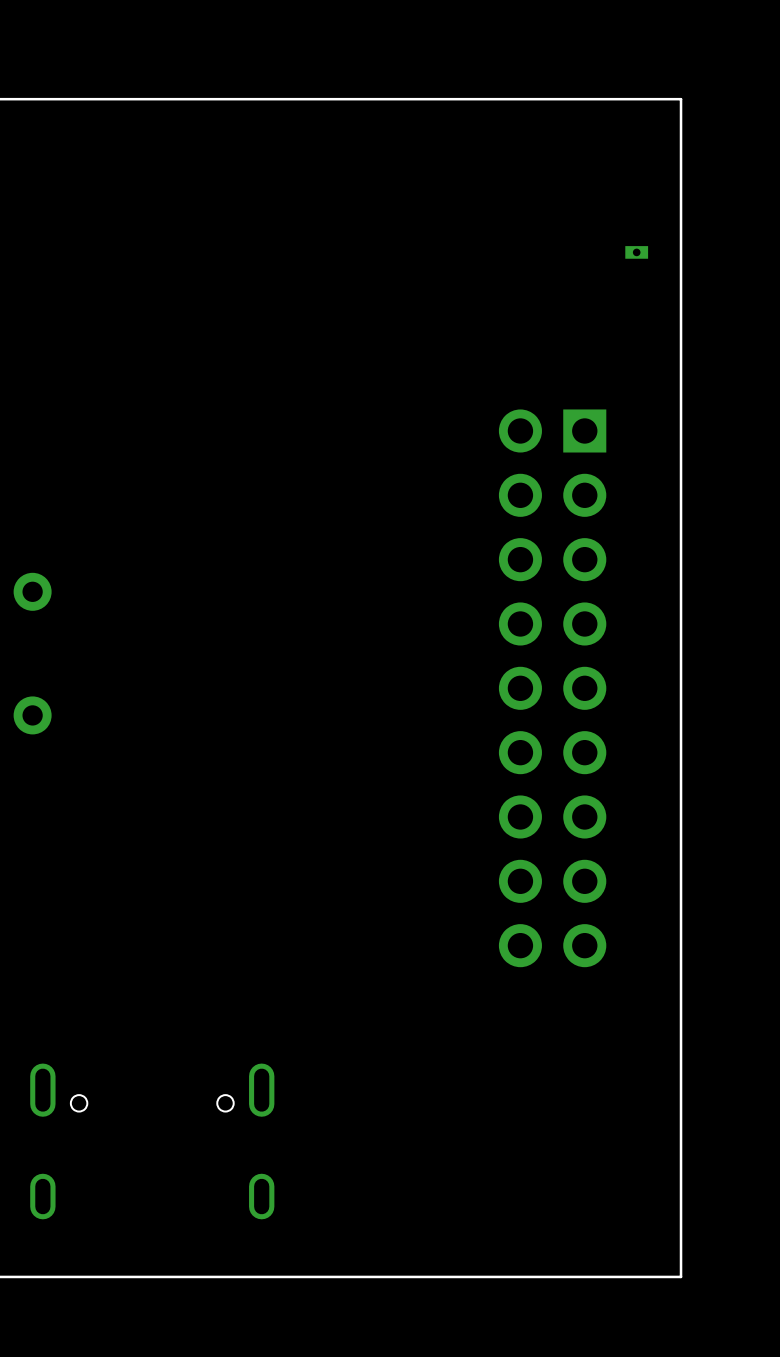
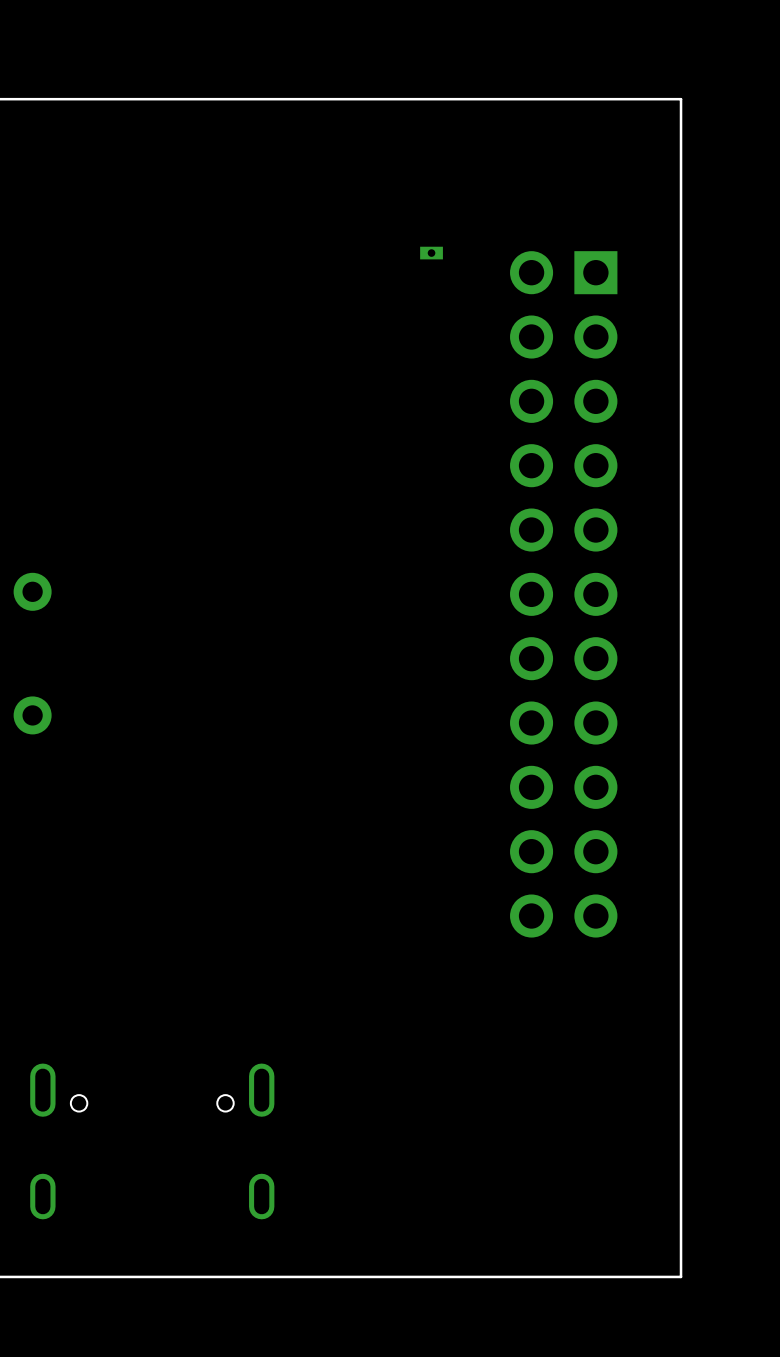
part position: (636, 252) -> (431, 253)
part: none -> (563, 594)
part: (552, 688) -> none

